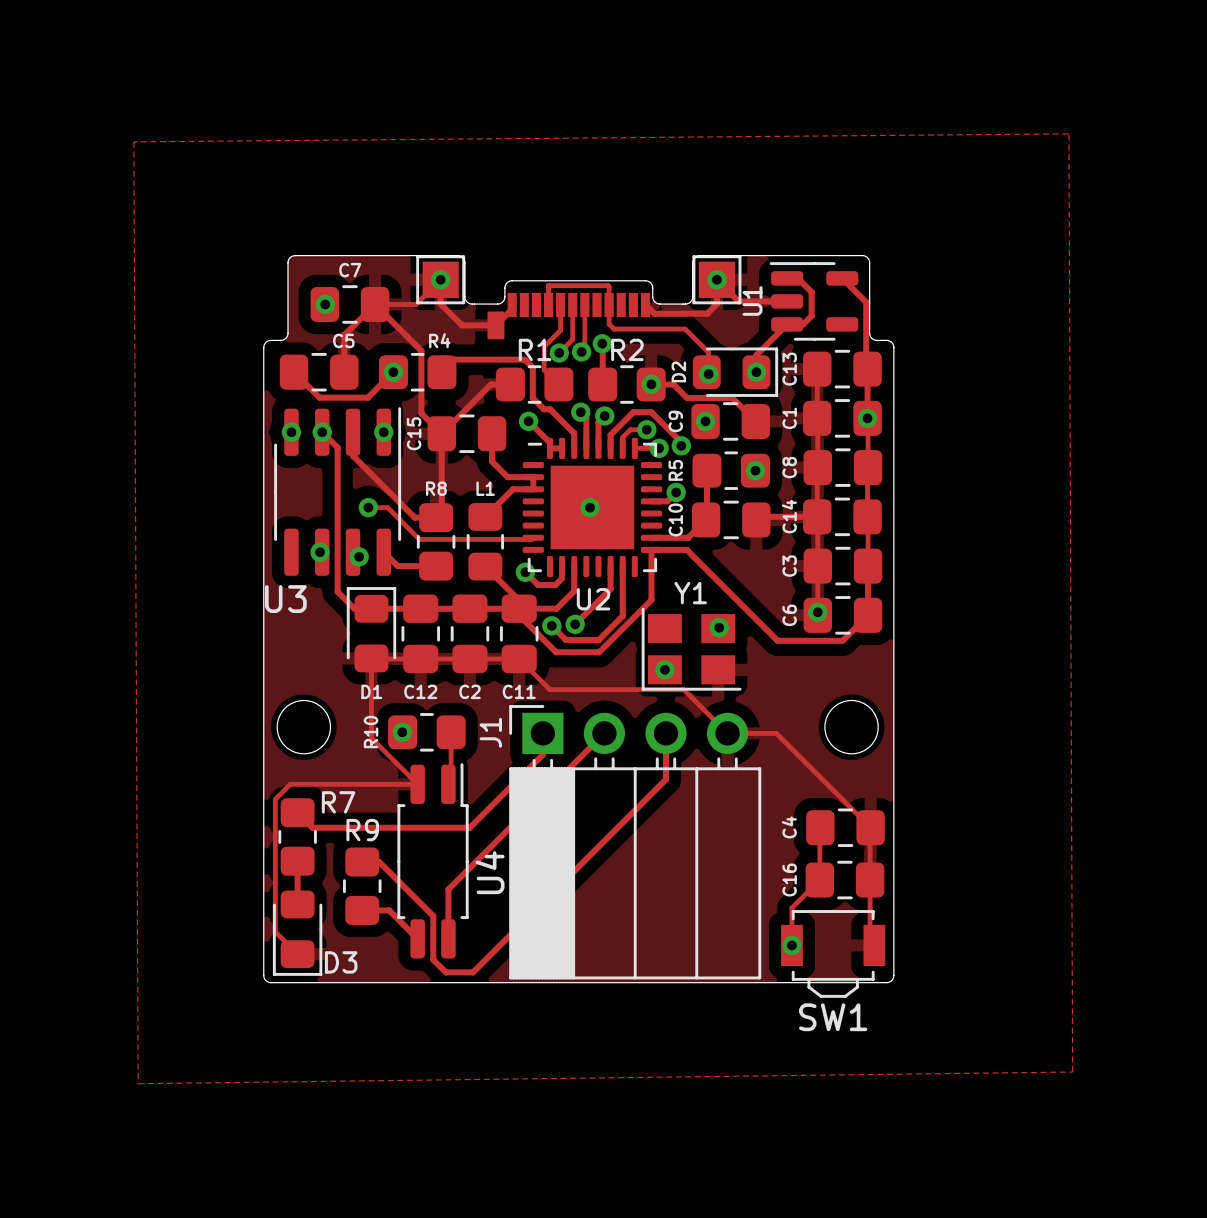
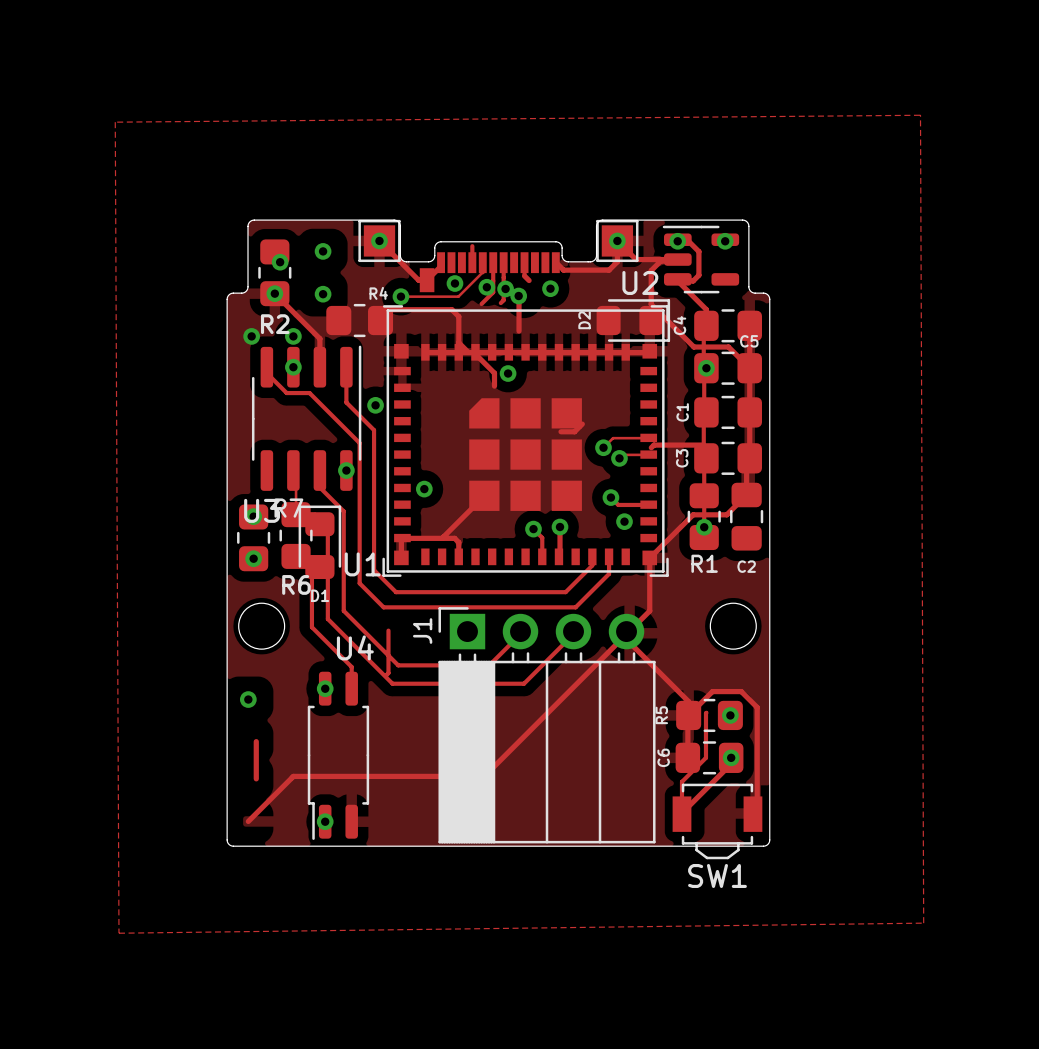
track: (842, 278) (866, 302) (868, 418) (868, 615) (842, 640) (777, 640) (686, 549) (651, 549) (651, 600) (599, 652) (556, 652) (519, 615) (519, 600) (485, 566) -> none
track: (440, 279) (440, 304) (462, 325) (486, 325) -> (379, 241) (418, 280)
track: (440, 279) (416, 304) (375, 304) -> none
via: none -> (677, 241)
via: none -> (725, 241)
track: (548, 285) (608, 285) (609, 305) -> none
via: none -> (323, 251)
U1 name: U1 (752, 301) -> U2 (640, 282)
track: none -> (677, 261) (660, 261) (651, 270) (651, 304) (693, 347) (728, 347) (749, 368) (746, 371)
C7: (349, 304) -> none
track: (375, 304) (421, 350) (421, 413) (441, 433) -> none
track: (375, 304) (344, 335) (344, 372) -> none
track: (811, 315) (803, 324) (787, 324) (756, 355) (756, 372) -> (698, 272) (698, 275) (693, 280) (677, 280) (706, 309) (706, 325)
track: (560, 316) (560, 330) (544, 346) (544, 369) (558, 384) -> (482, 272) (458, 296) (400, 296)
track: (609, 320) (609, 324) (614, 329) (685, 329) (708, 352) (708, 374) -> (524, 275) (529, 280)
via: none -> (454, 283)
via: none -> (486, 287)
via: none -> (505, 288)
via: none -> (550, 288)
track: none -> (274, 293) (319, 338) (319, 367)
via: none -> (274, 293)
via: none -> (323, 294)
via: none -> (400, 296)
R1 name position: R1 (535, 349) -> R1 (704, 563)
R2 name position: R2 (627, 349) -> R2 (275, 324)
via: (581, 351) -> none
via: (559, 353) -> none
C13: (842, 369) -> none
track: (294, 372) (319, 397) (367, 397) (393, 372) -> none
C5 position: (319, 372) -> (728, 368)
via: (393, 372) -> none
via: (756, 372) -> none
via: (708, 374) -> none
track: none -> (749, 325) (749, 458) (746, 461) (746, 495) (726, 514) (693, 514) (649, 558) (649, 610) (484, 776) (293, 776) (248, 821)
track: (510, 384) (491, 384) (441, 433) -> none
R1 rotation: 0° (534, 384) -> 90° clockwise (704, 516)
R1 position: (534, 384) -> (704, 516)
R2 rotation: 0° (626, 384) -> 90° clockwise (274, 272)
R2 position: (626, 384) -> (274, 272)
track: (651, 384) (673, 384) (686, 397) (732, 397) (755, 421) -> none
via: (651, 384) -> none
via: none -> (251, 336)
via: none -> (293, 336)
track: (580, 412) (586, 417) (586, 448) -> none
via: (580, 412) -> none
track: (604, 415) (598, 422) (598, 448) -> none
via position: (604, 415) -> (508, 373)
C1 position: (842, 418) -> (728, 412)
via: (867, 418) -> none
track: (528, 421) (550, 442) (550, 448) (562, 448) -> none
via: (528, 421) -> none
via: (705, 421) -> none
C9: (730, 421) -> none
track: none -> (266, 367) (266, 373) (286, 393) (309, 393) (359, 443) (359, 583) (383, 607) (575, 607) (609, 573) (609, 557)
track: none -> (346, 367) (346, 402) (374, 430) (374, 570) (396, 592) (565, 592) (592, 565) (592, 557)
via: none -> (706, 368)
track: (646, 429) (630, 429) (622, 437) (622, 448) -> none
via: (646, 429) -> none
via: (291, 432) -> none
track: (322, 432) (337, 447) (337, 591) (354, 608) (519, 608) -> none
via position: (322, 432) -> (293, 367)
track: (353, 432) (353, 455) (414, 517) (436, 517) (441, 512) (441, 433) -> none
via: (383, 432) -> none
C15: (466, 433) -> none
track: (492, 433) (492, 461) (507, 477) (533, 477) (533, 489) (512, 489) (485, 516) -> none
track: (681, 445) (681, 442) (651, 412) (633, 412) (610, 434) (610, 448) -> none
via: (681, 445) -> none
track: (634, 448) (659, 448) -> none
via: (659, 448) -> none
C8: (842, 467) -> none
via: none -> (375, 405)
track: (706, 470) (706, 519) (688, 537) (651, 537) -> none
R5 position: (731, 470) -> (709, 715)
via: (755, 470) -> none
U3 position: (337, 491) -> (306, 418)
via: (676, 492) -> none
track: (368, 507) (387, 507) (419, 539) (531, 539) (533, 537) -> none
via: (368, 507) -> none
via: (590, 507) -> none
U2: (592, 507) -> none
track: none -> (648, 438) (613, 438) (603, 447)
U1: none -> (525, 441)
C14: (842, 516) -> none
via: none -> (603, 447)
C10: (731, 519) -> none
track: none -> (648, 454) (622, 454) (619, 458)
via: none -> (619, 458)
R8: (436, 541) -> none
L1: (485, 541) -> none
track: none -> (293, 470) (296, 473) (296, 514) (315, 514) (327, 527) (327, 619) (392, 683) (523, 683) (570, 636)
track: none -> (319, 470) (319, 487) (343, 511) (343, 610) (398, 665) (489, 665) (517, 636)
via: none -> (346, 470)
via: (320, 552) -> none
track: (383, 552) (397, 566) (436, 566) -> none
via: (359, 556) -> none
track: (562, 566) (562, 578) (555, 585) (538, 585) (525, 572) -> none
track: (574, 566) (574, 591) (556, 608) (519, 608) -> none
track: (610, 566) (610, 588) (575, 624) -> none
track: (622, 566) (622, 616) (598, 639) (565, 639) (551, 625) -> none
C3 position: (842, 566) -> (728, 458)
via position: (525, 572) -> (424, 489)
track: none -> (484, 496) (442, 538)
track: none -> (610, 497) (618, 504) (648, 504)
via: none -> (610, 497)
via: none -> (253, 516)
track: none -> (560, 527) (558, 557)
via: none -> (560, 527)
track: none -> (533, 529) (542, 537) (542, 556)
via: none -> (533, 529)
C6 position: (842, 615) -> (709, 757)
R6: none -> (296, 535)
via: (575, 624) -> none
via: (551, 625) -> none
via position: (719, 627) -> (624, 521)
C12: (420, 633) -> none
C2 position: (469, 633) -> (746, 516)
C11: (519, 633) -> none
track: none -> (296, 556) (311, 572) (311, 627) (351, 667) (351, 688)
track: none -> (458, 557) (458, 542) (454, 538) (402, 538) (401, 558)
via: none -> (253, 558)
Y1: (691, 649) -> none
via: (664, 669) -> none
via: (402, 732) -> none
R10: (426, 732) -> none
track: (542, 733) (542, 754) (469, 827) (312, 827) (297, 812) -> none
track: (604, 733) (448, 889) (448, 938) -> none
track: (666, 733) (666, 779) (473, 972) (445, 972) (433, 959) (433, 916) (379, 861) (362, 861) -> none
track: none -> (623, 636) (688, 701) (688, 715) (693, 720)
via: none -> (325, 688)
via: none -> (248, 699)
C4 position: (845, 827) -> (728, 325)
via: none -> (730, 715)
R7 position: (297, 836) -> (253, 537)
U4 rotation: 0° (433, 860) -> 180° (338, 755)
U4 name position: U4 (490, 872) -> U4 (355, 647)
track: none -> (687, 757) (687, 716) (712, 691) (741, 691) (757, 707) (757, 811) (755, 813)
C16: (844, 880) -> none
track: none -> (731, 757) (731, 763) (684, 810) (684, 813)
via: none -> (731, 757)
R9: (362, 886) -> none
track: (362, 910) (389, 910) (417, 938) -> none
D3: (297, 933) -> none
via: (791, 945) -> none
track: (874, 945) (870, 941) (870, 827) (776, 733) (727, 733) (683, 689) (549, 689) (519, 658) (371, 658) (371, 738) (417, 784) (290, 784) (275, 799) (275, 931) (297, 954) -> none
via: none -> (325, 821)

